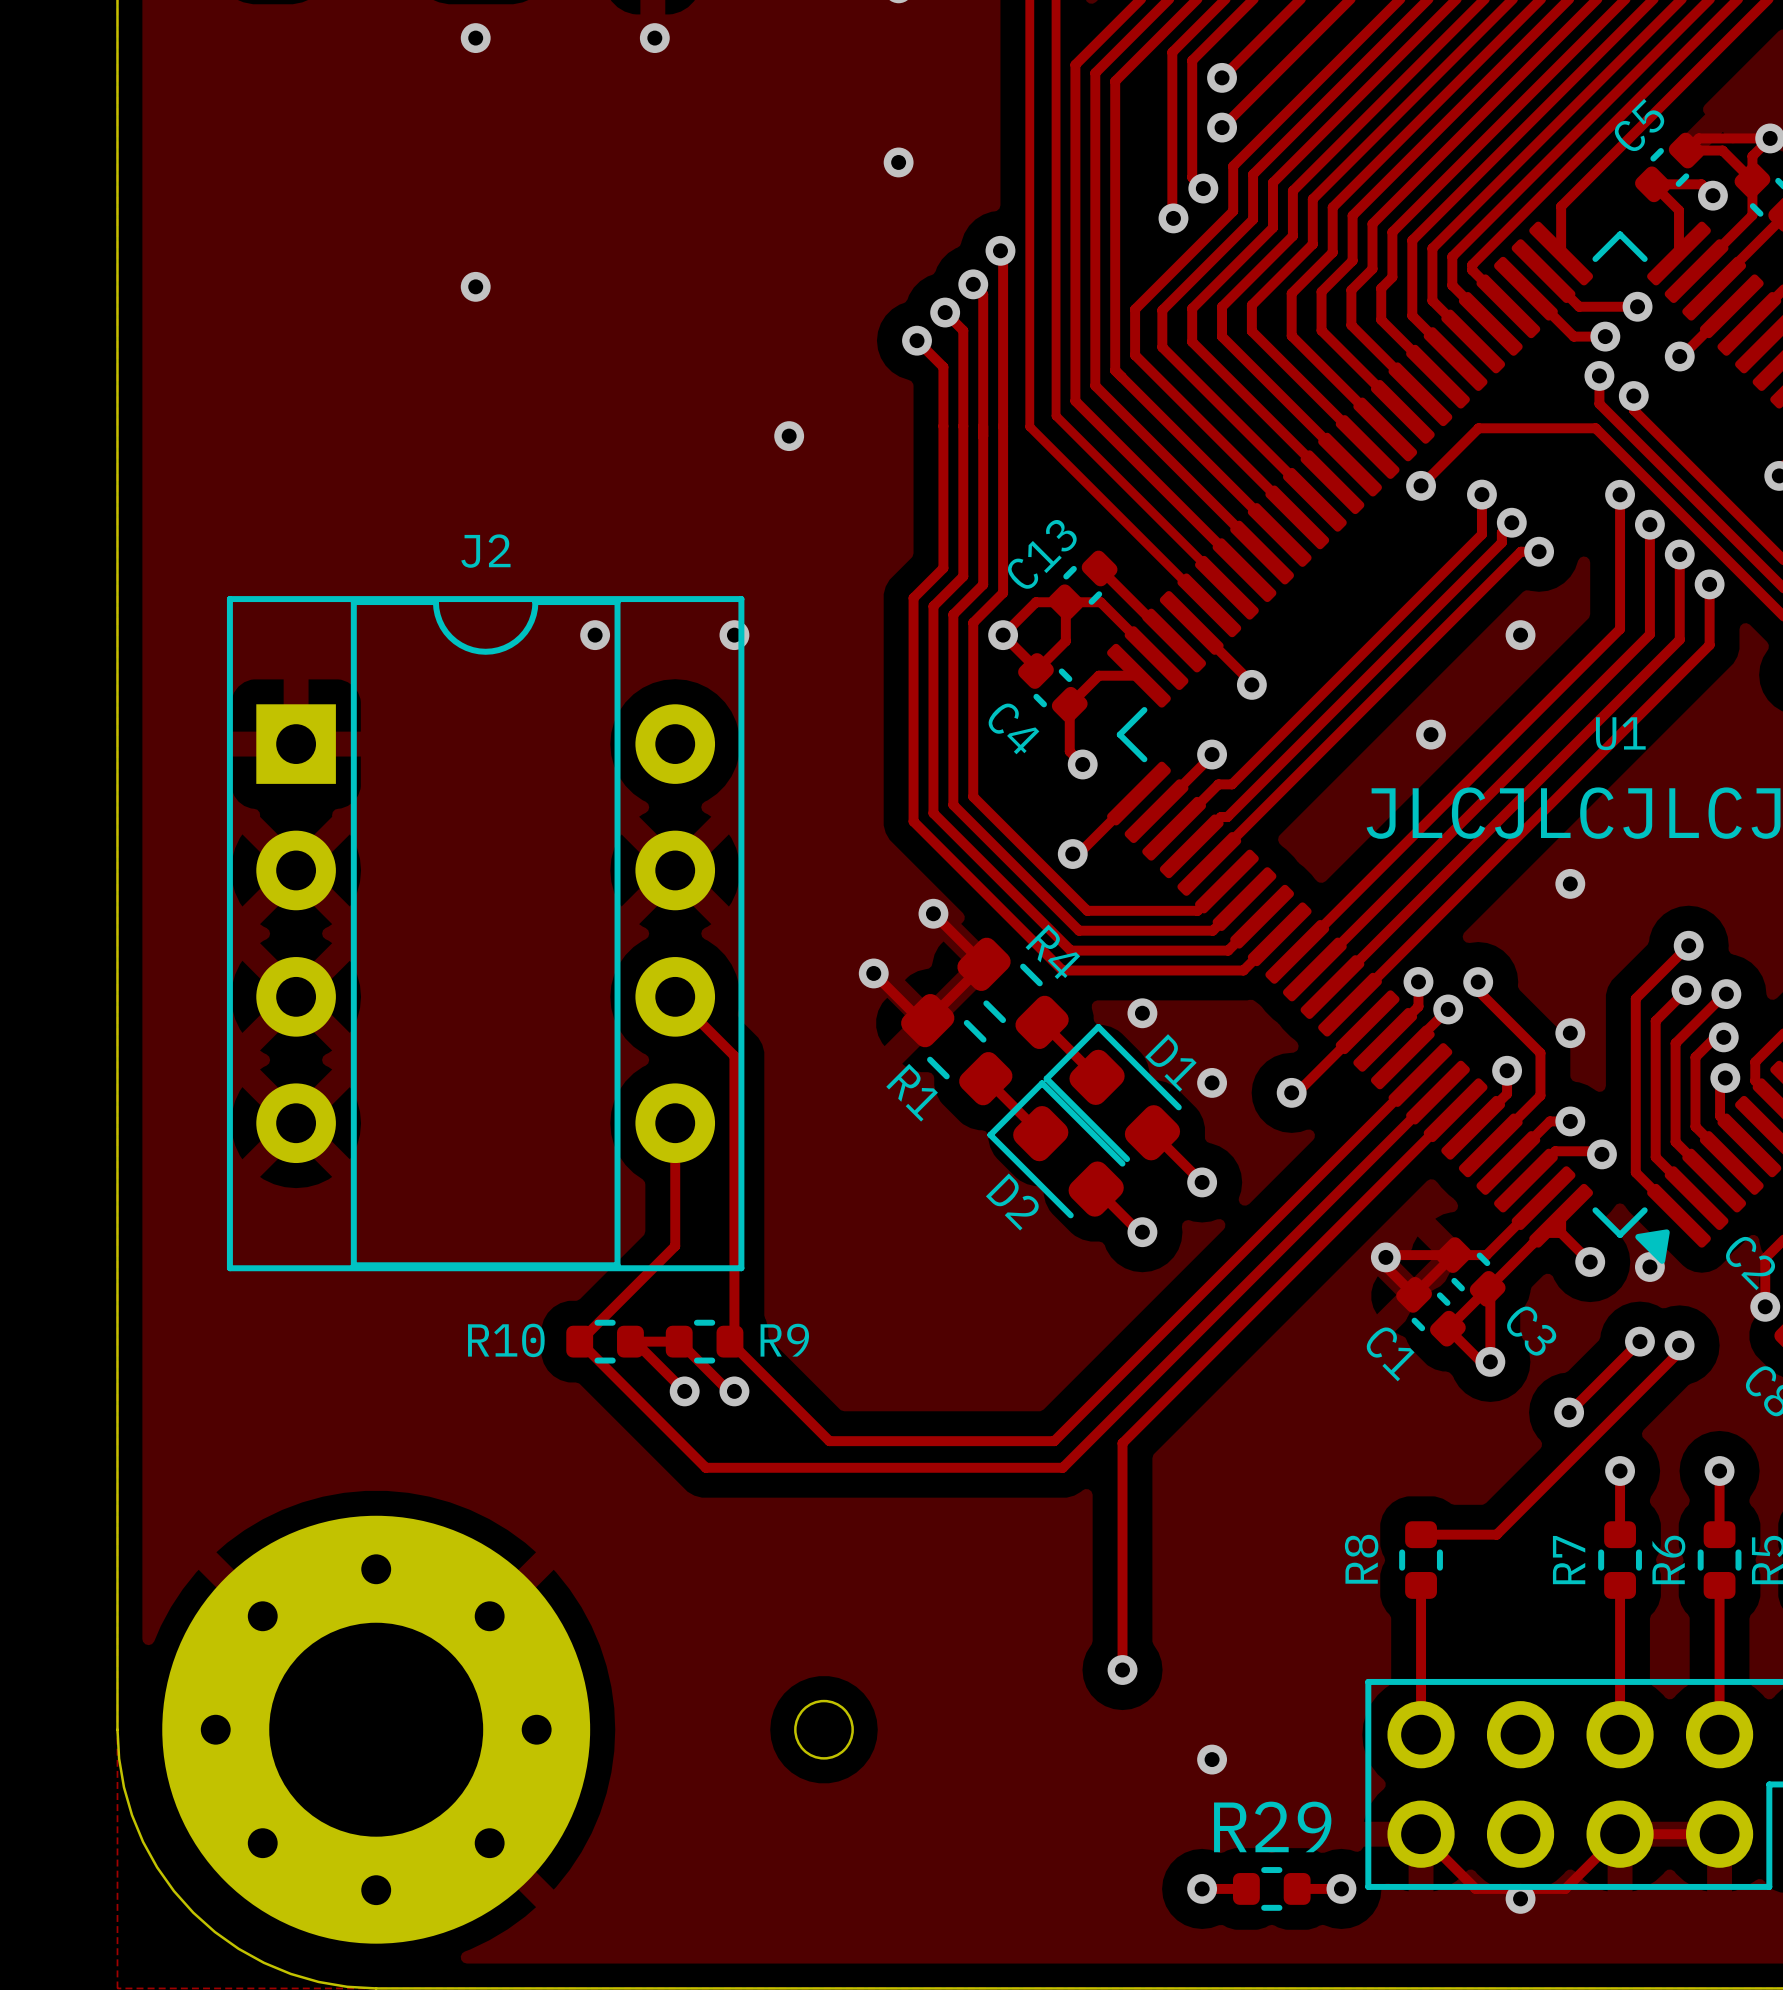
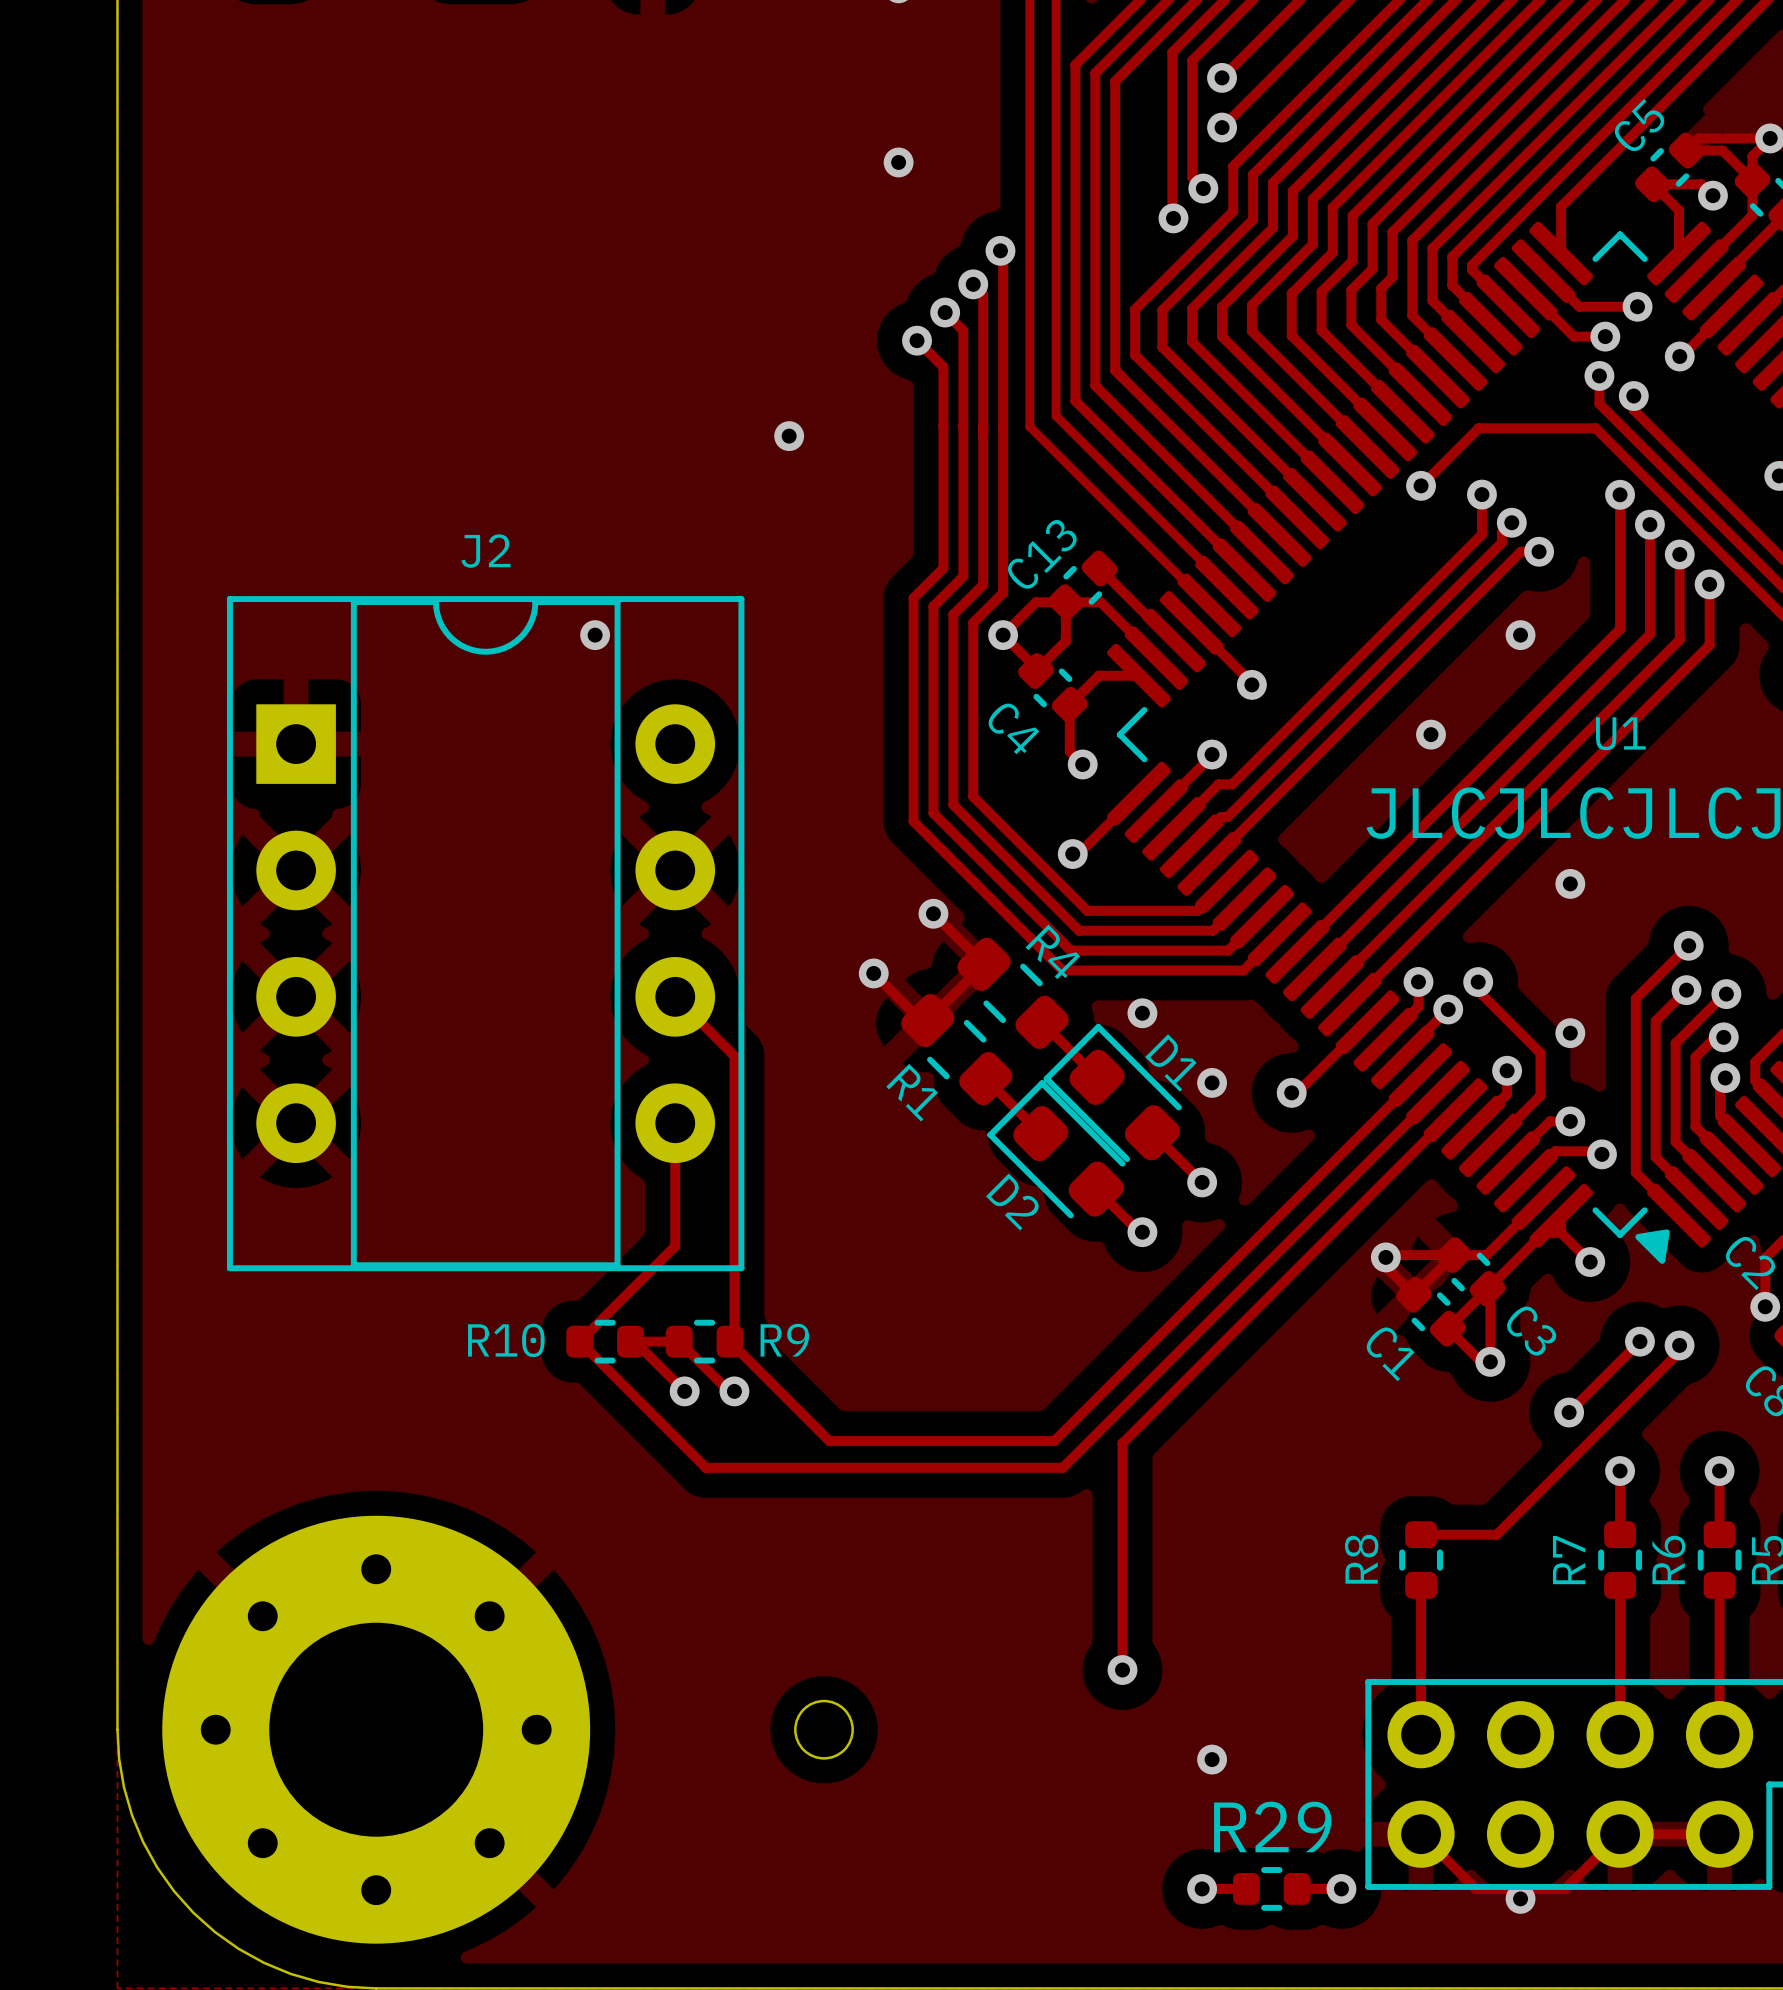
via: (475, 38) -> none
via: (654, 38) -> none
via: (475, 286) -> none
via: (734, 635) -> none
via: (1649, 1267) -> none

